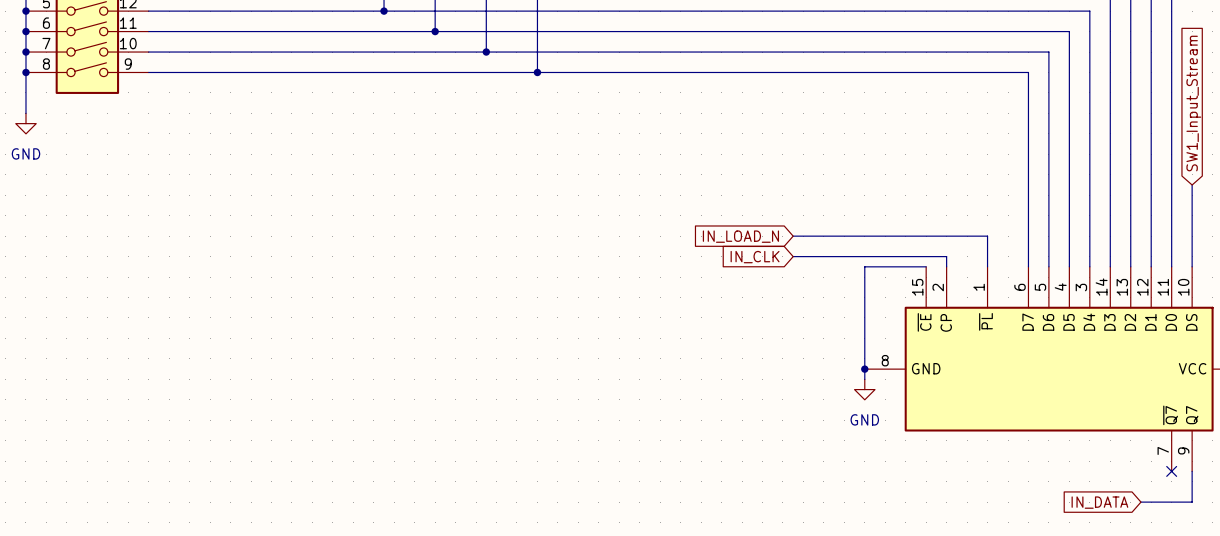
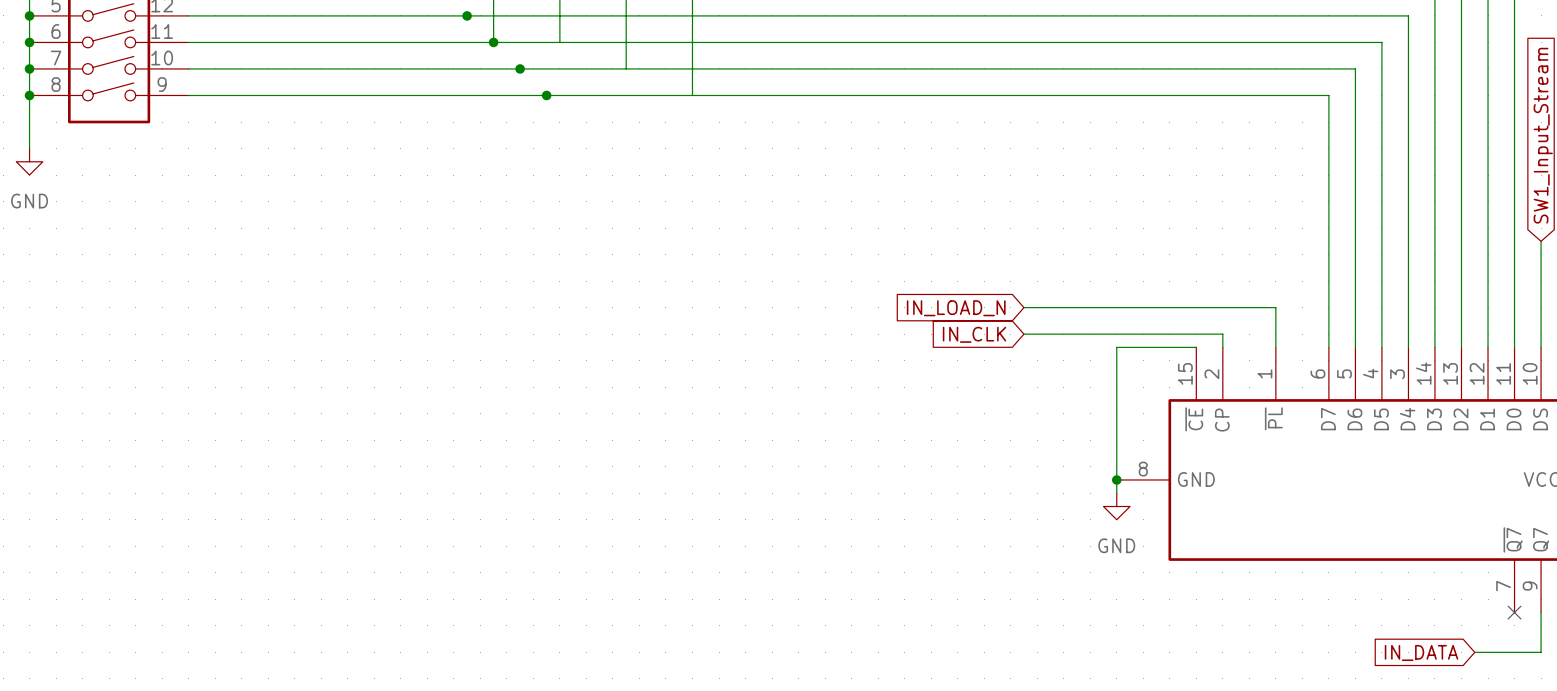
junction: none -> (467, 15)
wire: none -> (493, 15) (493, 42)
junction: (384, 11) -> none
junction: none -> (493, 42)
junction: (435, 31) -> none
junction: none -> (520, 68)
junction: (486, 52) -> none
junction: none -> (546, 95)
junction: (537, 72) -> none

